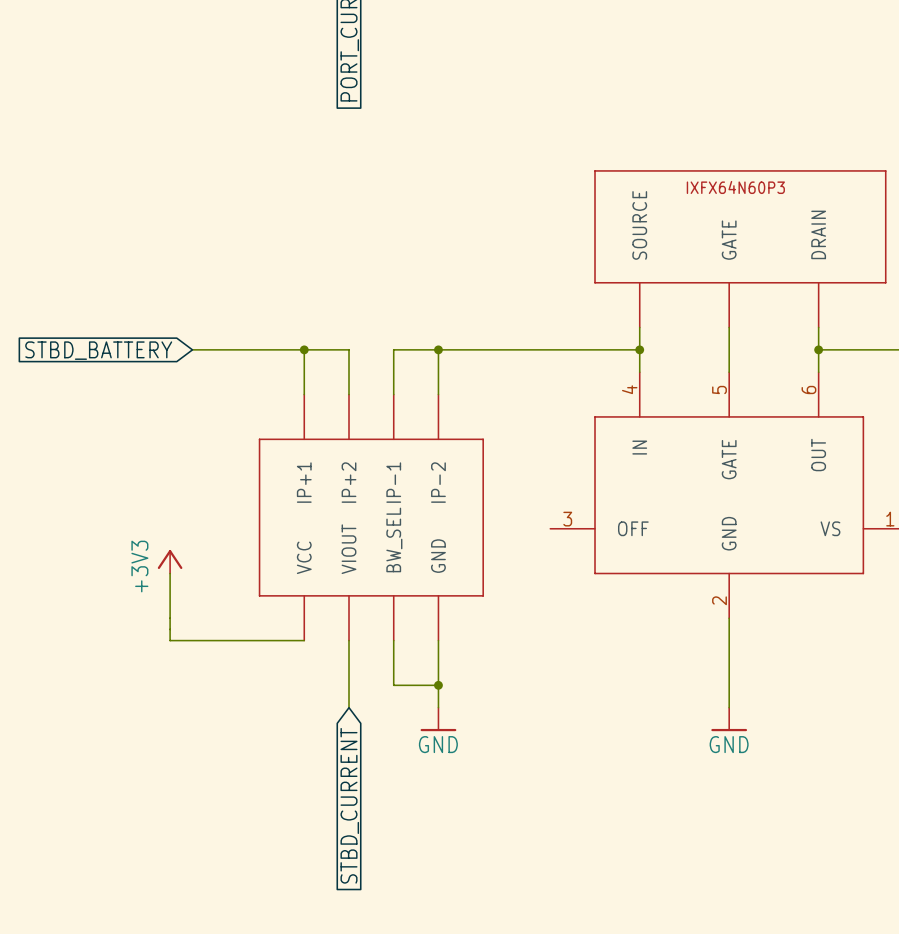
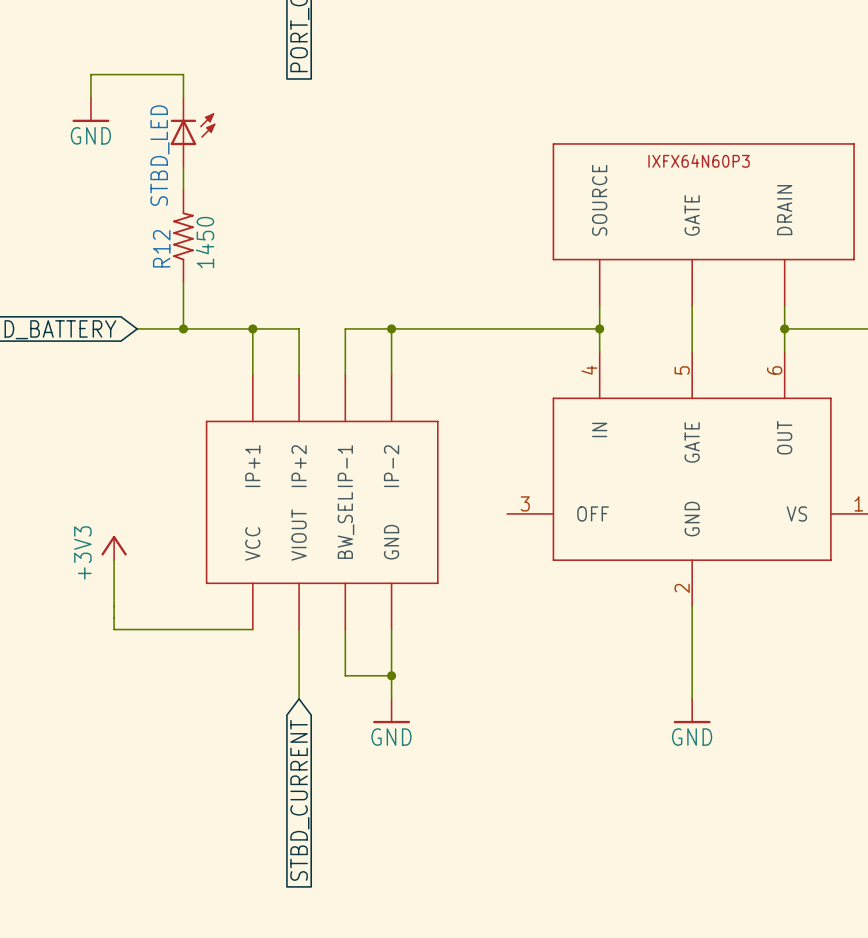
wire: none -> (90, 97) (90, 74) (183, 74) (183, 97)
power symbol: none -> GND (90, 109)
STBD_LED: none -> (193, 132)
wire: none -> (183, 167) (183, 190)
R12: none -> 1450 (183, 236)
wire: none -> (183, 282) (183, 328)
junction: none -> (183, 328)

